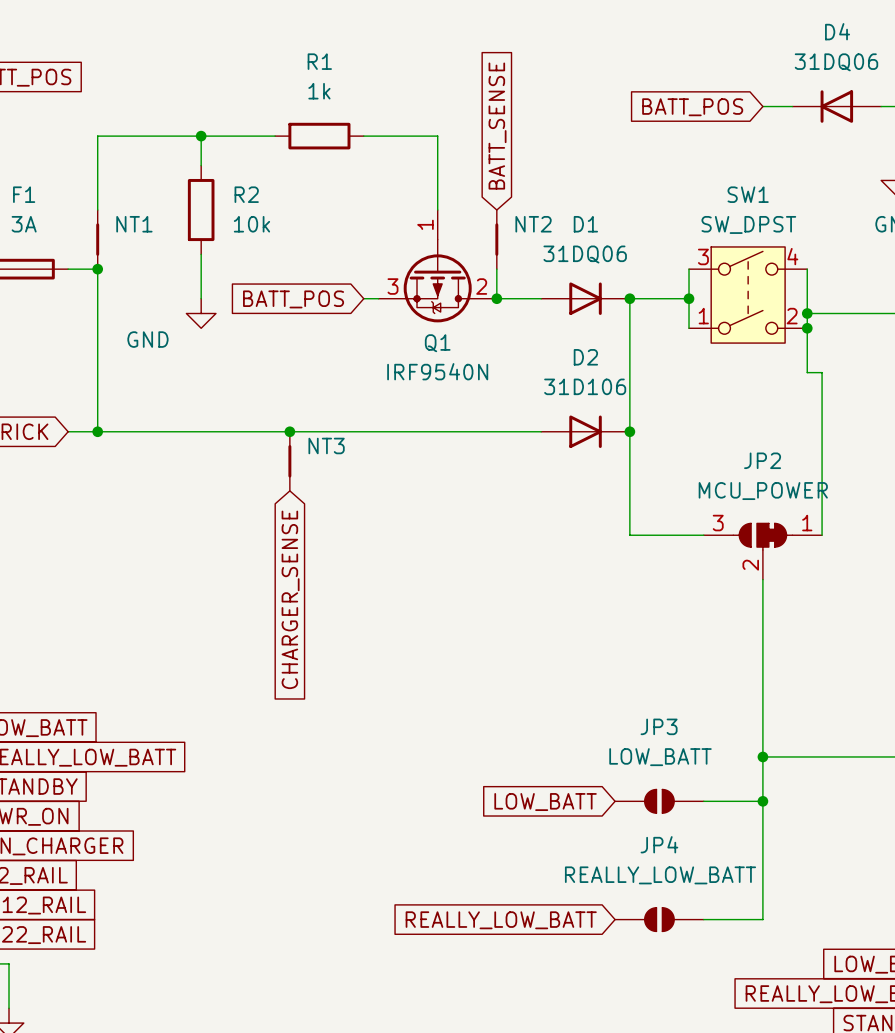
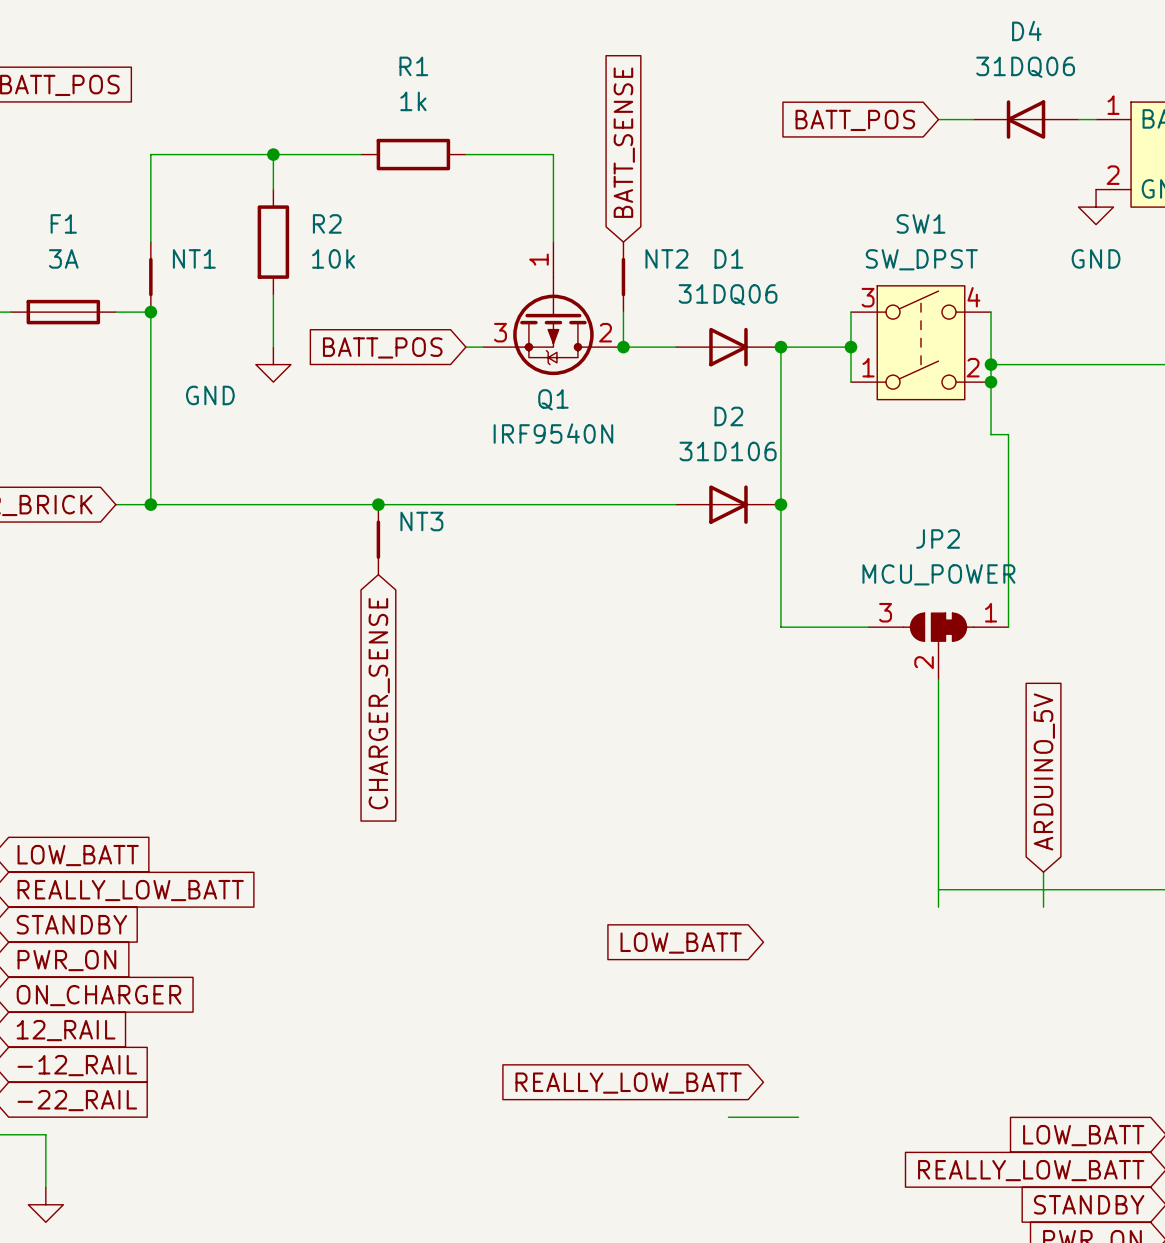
global label: none -> ARDUINO_5V (1044, 771)
wire: none -> (1043, 872) (1043, 907)
junction: (762, 756) -> none
wire: (762, 771) (762, 919) (703, 919) -> none
JP3: LOW_BATT (659, 801) -> none
wire: (703, 801) (762, 801) -> (728, 1117) (798, 1117)
junction: (762, 801) -> none
JP4: REALLY_LOW_BATT (659, 919) -> none

